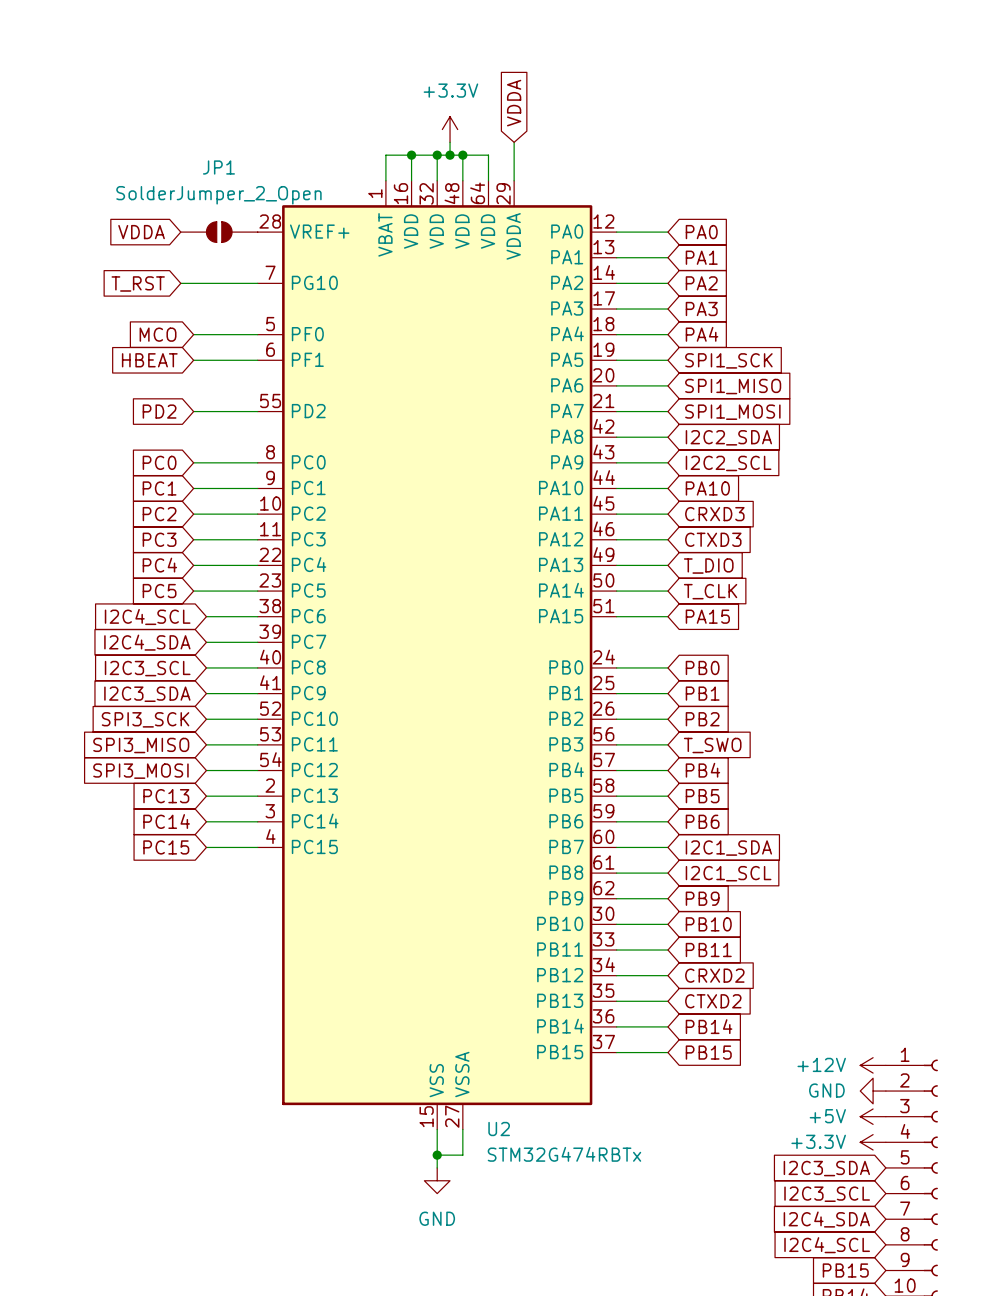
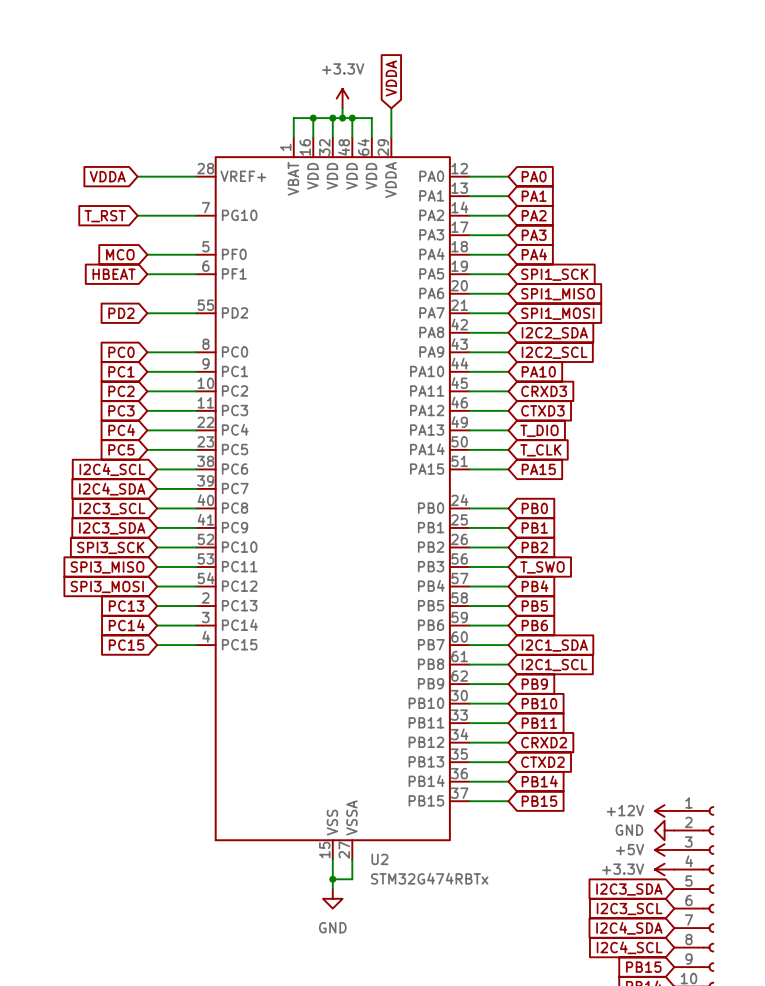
JP1: SolderJumper_2_Open (219, 232) -> none

